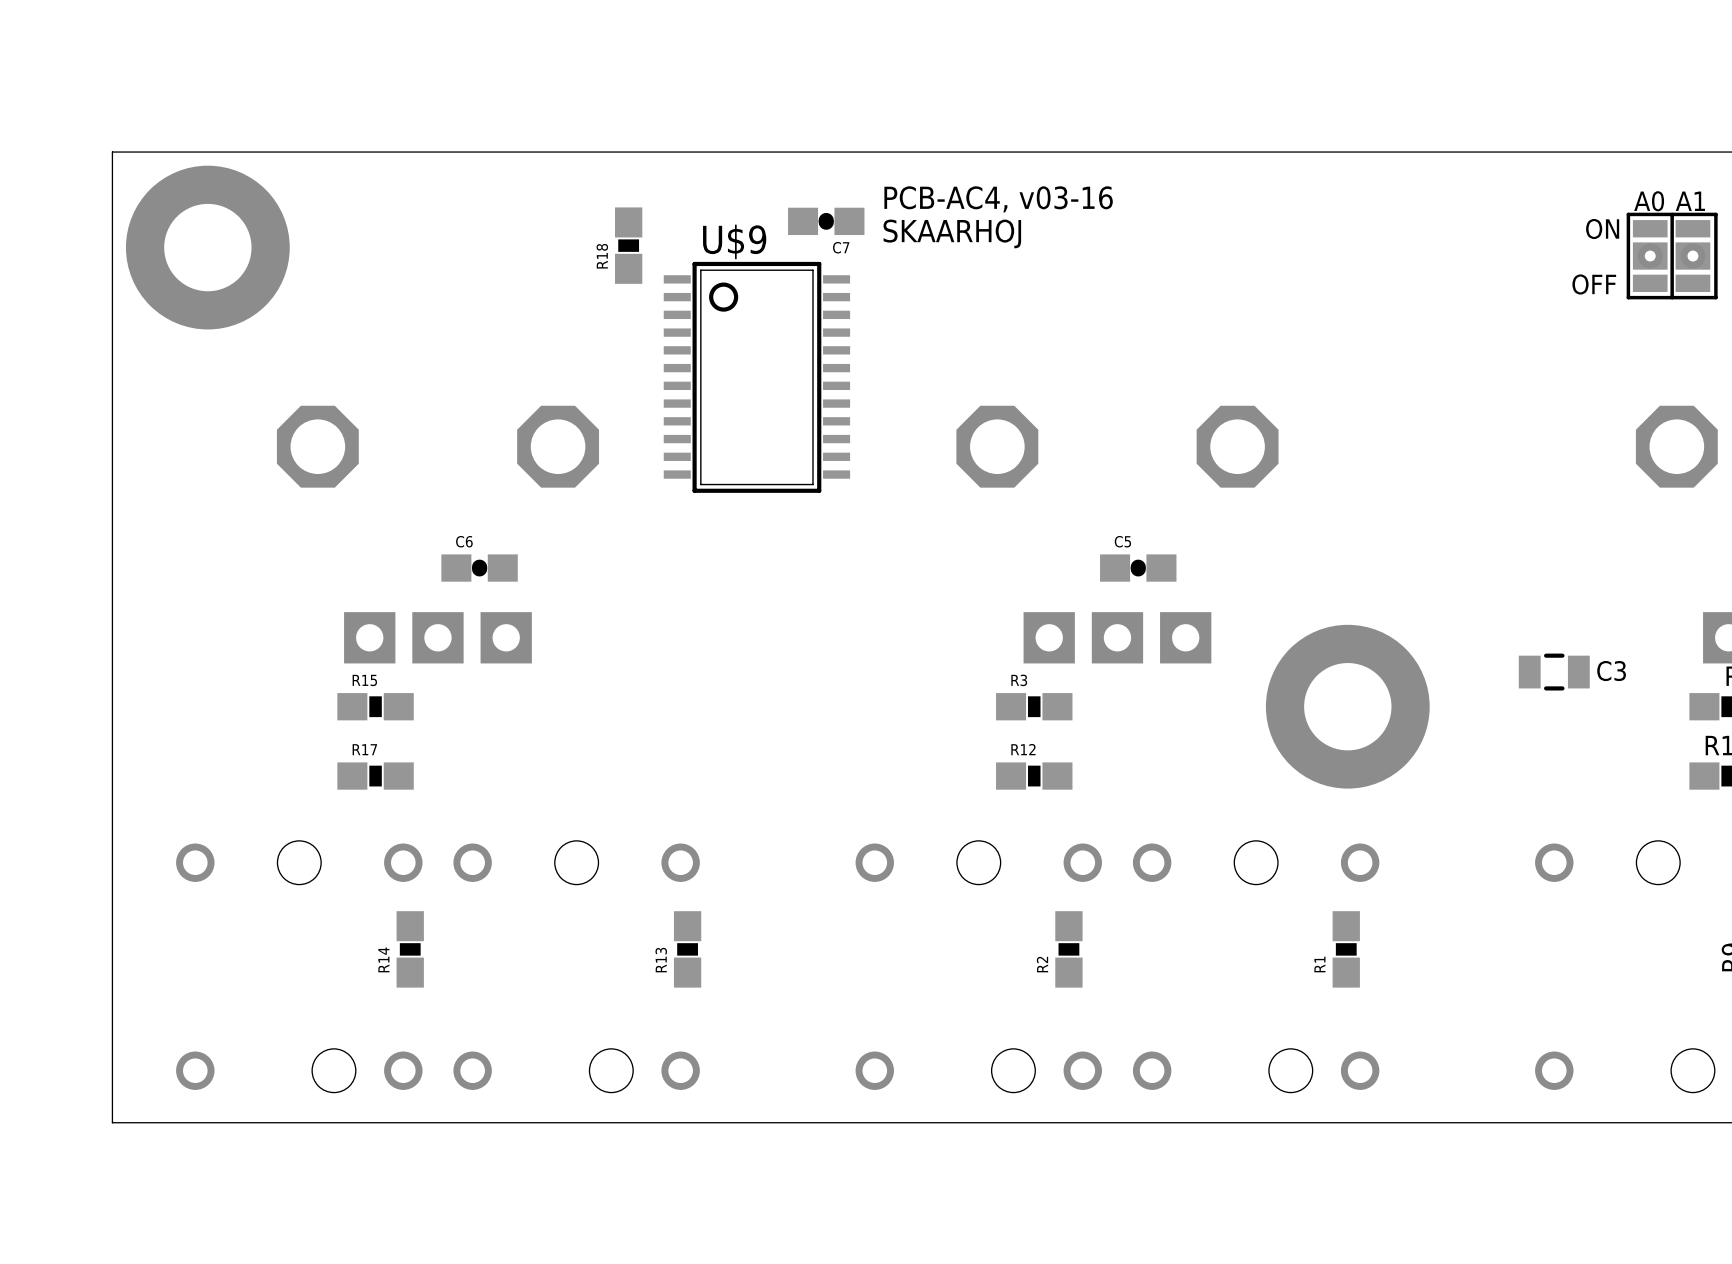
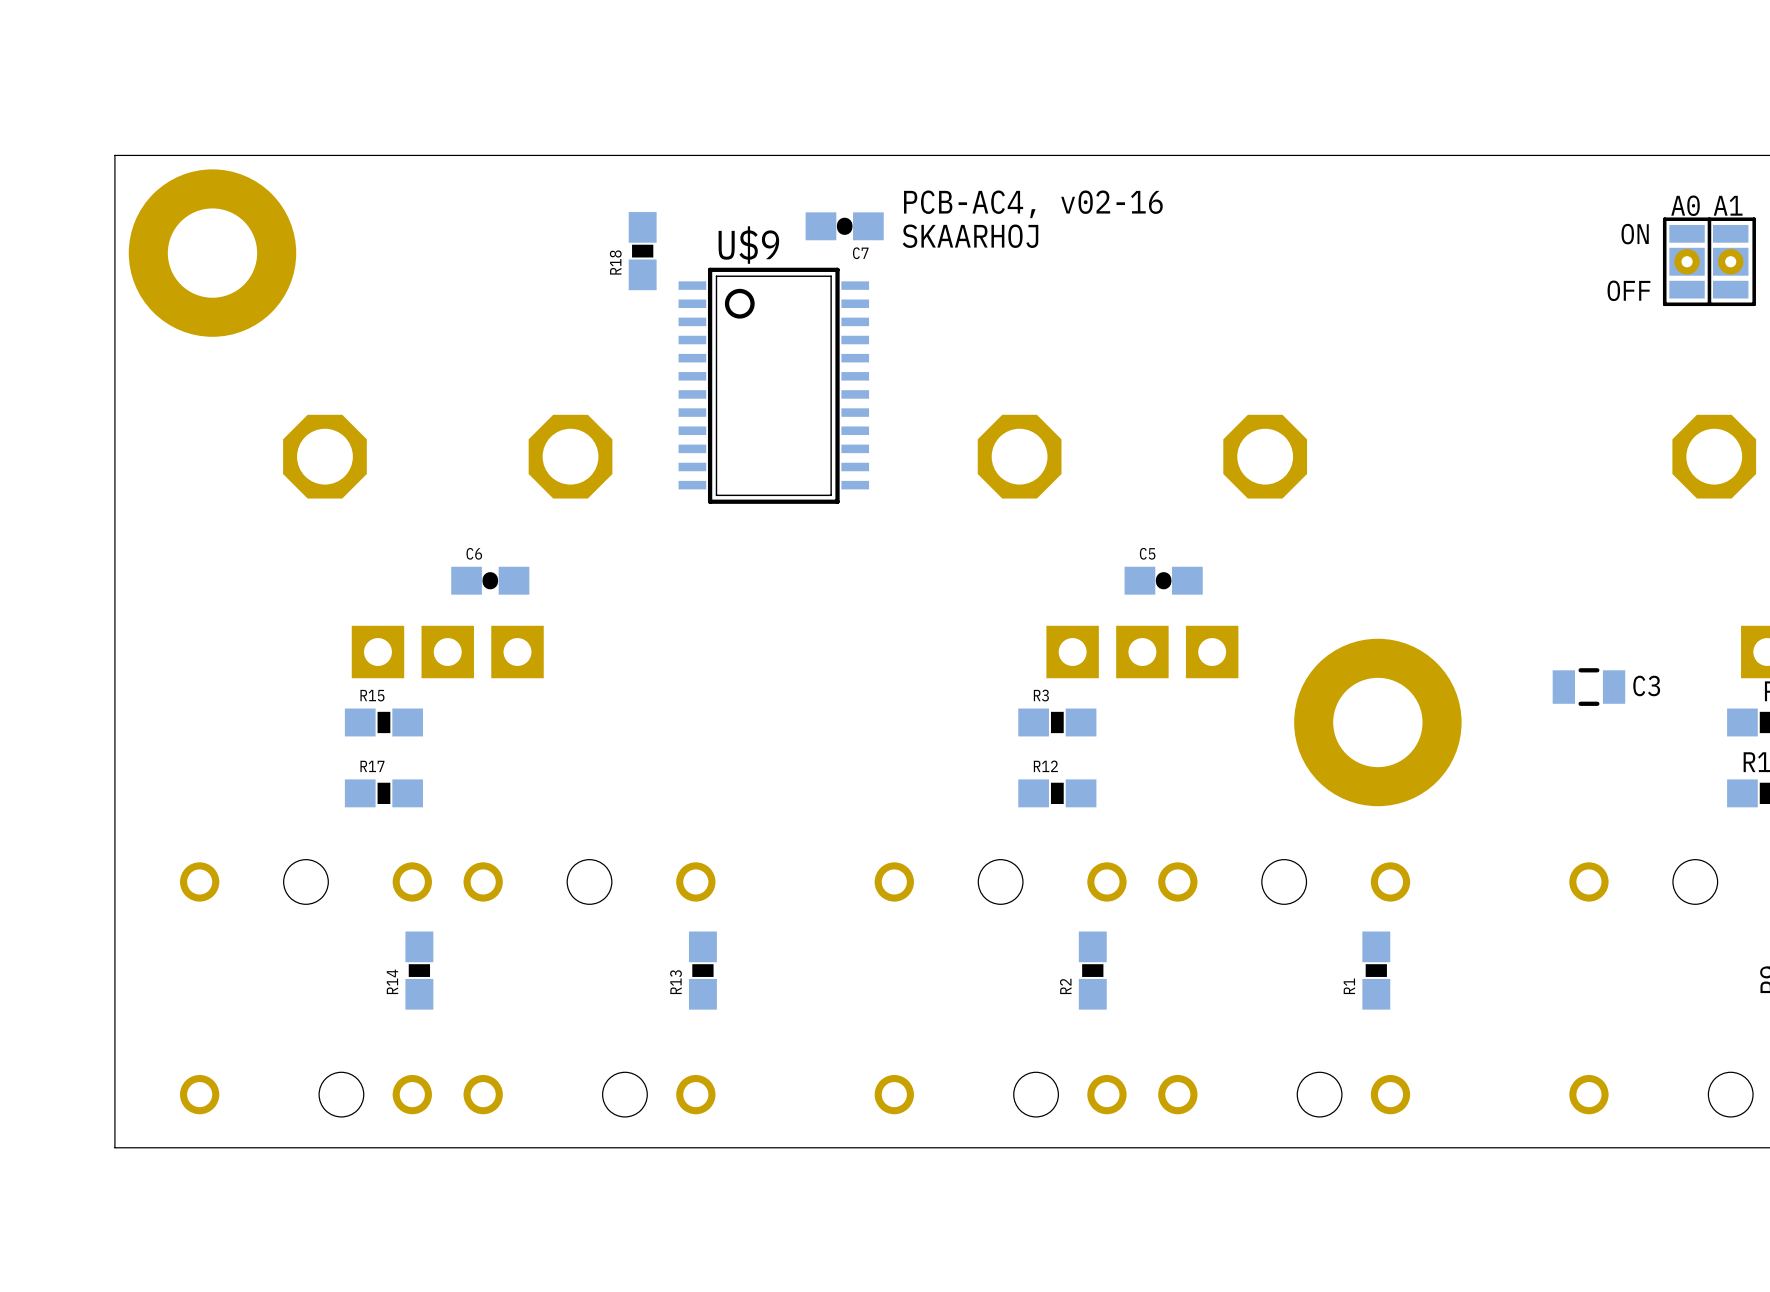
text: PCB-AC4, v03-16 (998, 199) -> PCB-AC4, v02-16 (1033, 204)

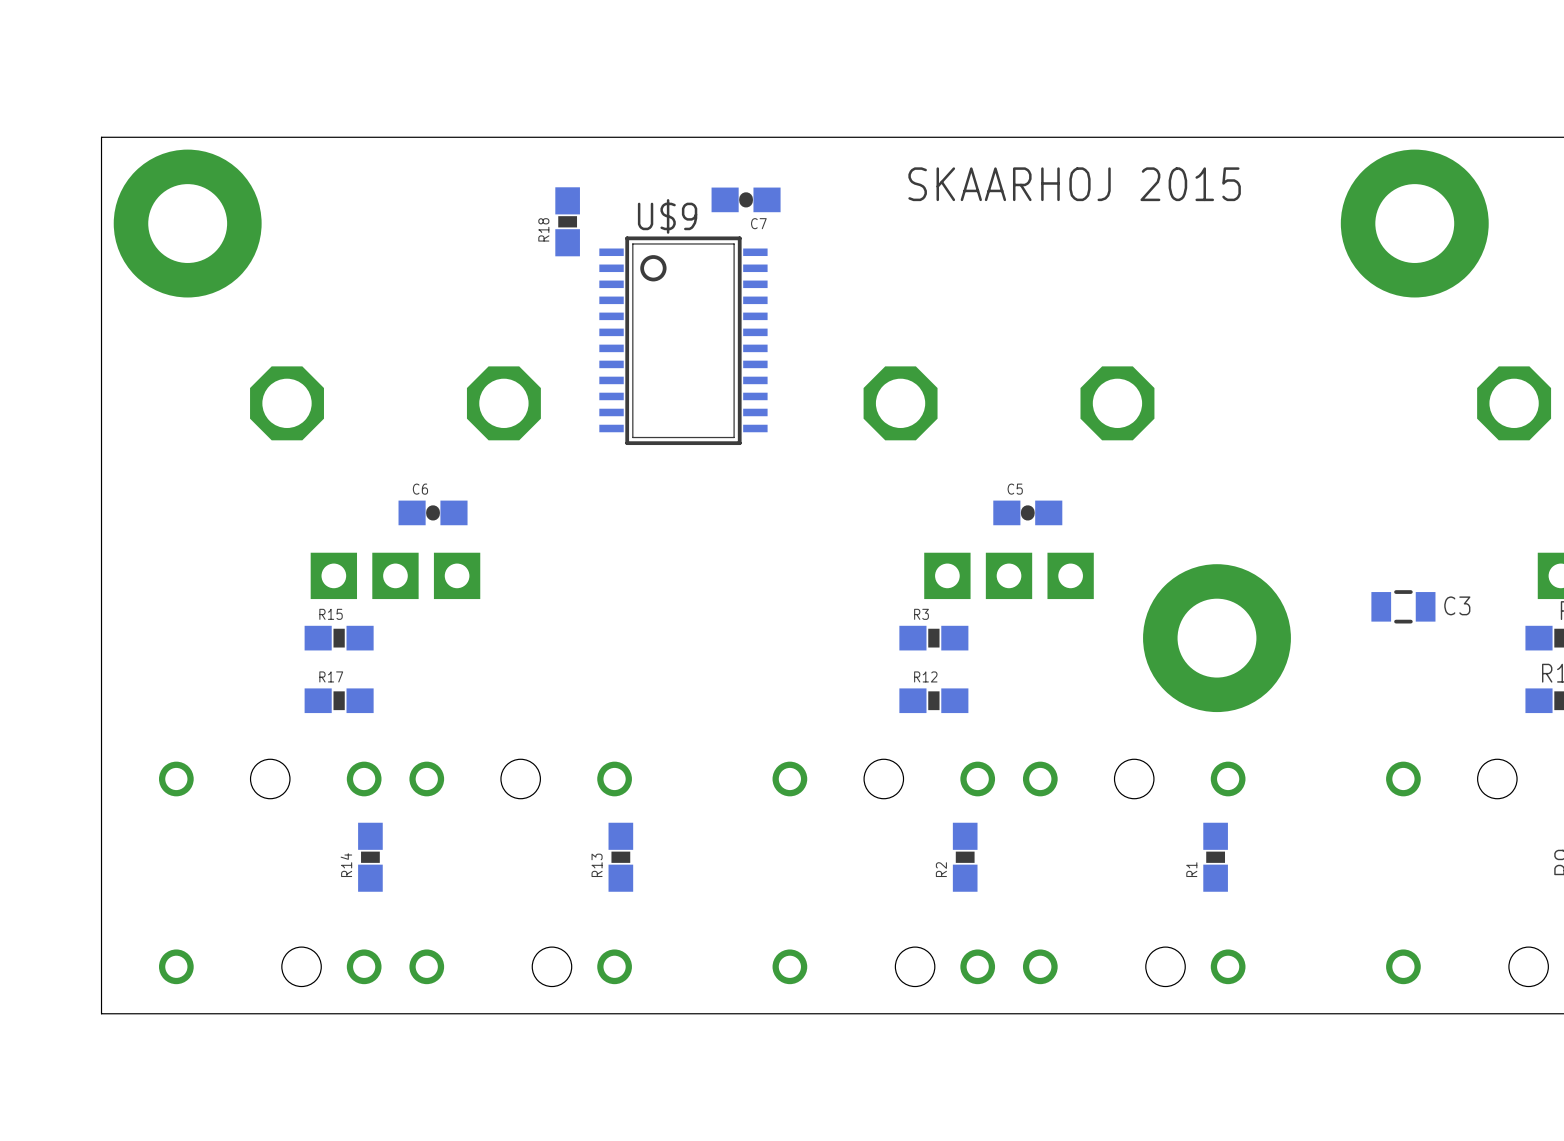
text: PCB-AC4, v02-16 (1033, 204) -> none
text: SKAARHOJ (970, 236) -> SKAARHOJ 2015 (1074, 184)
part: none -> (1414, 223)
part: (1709, 261) -> none

